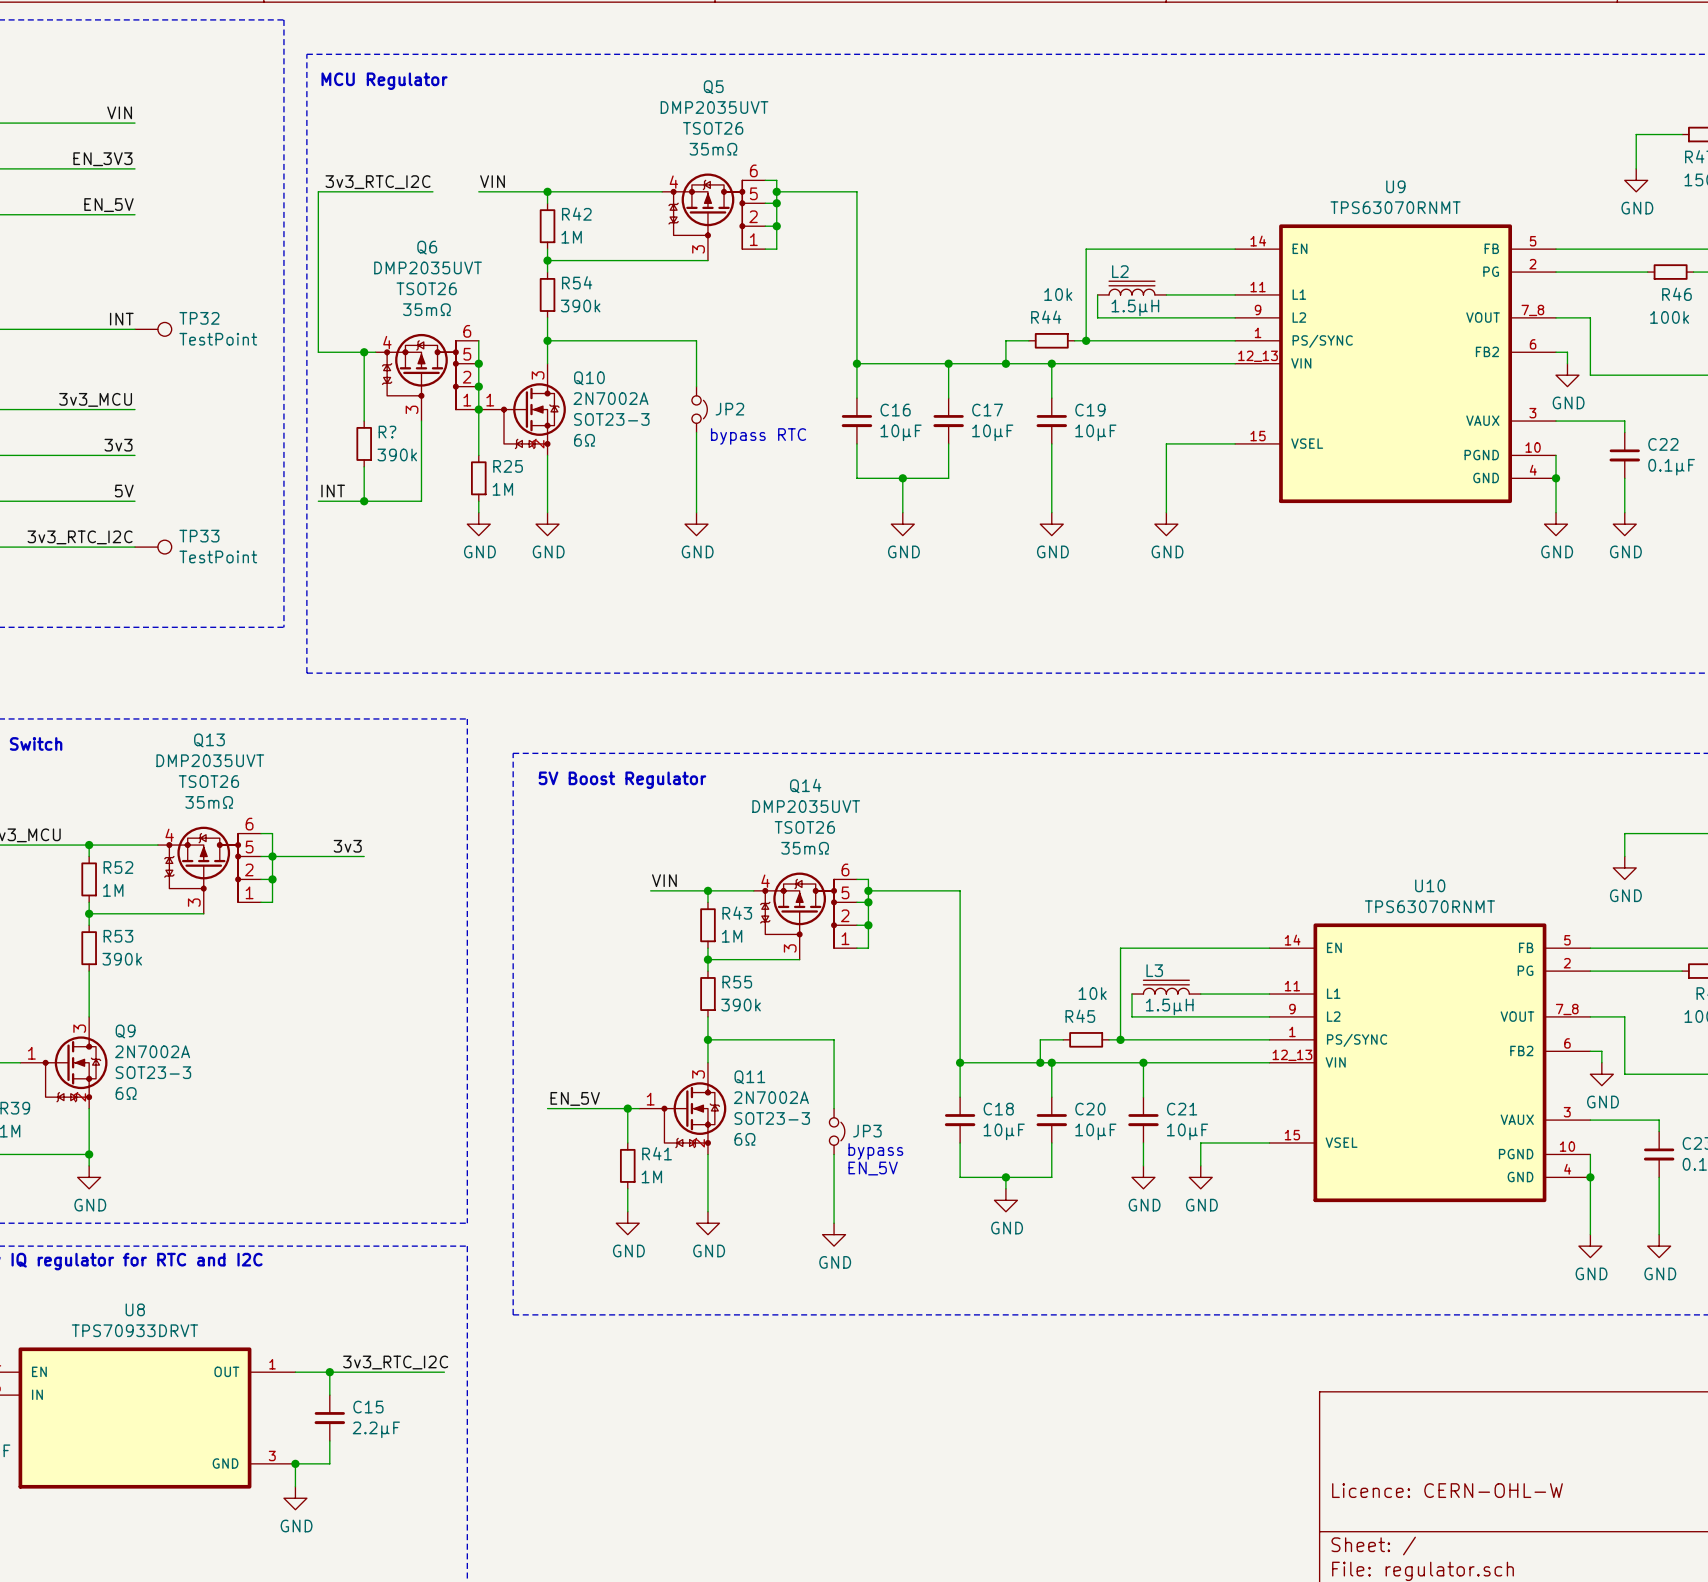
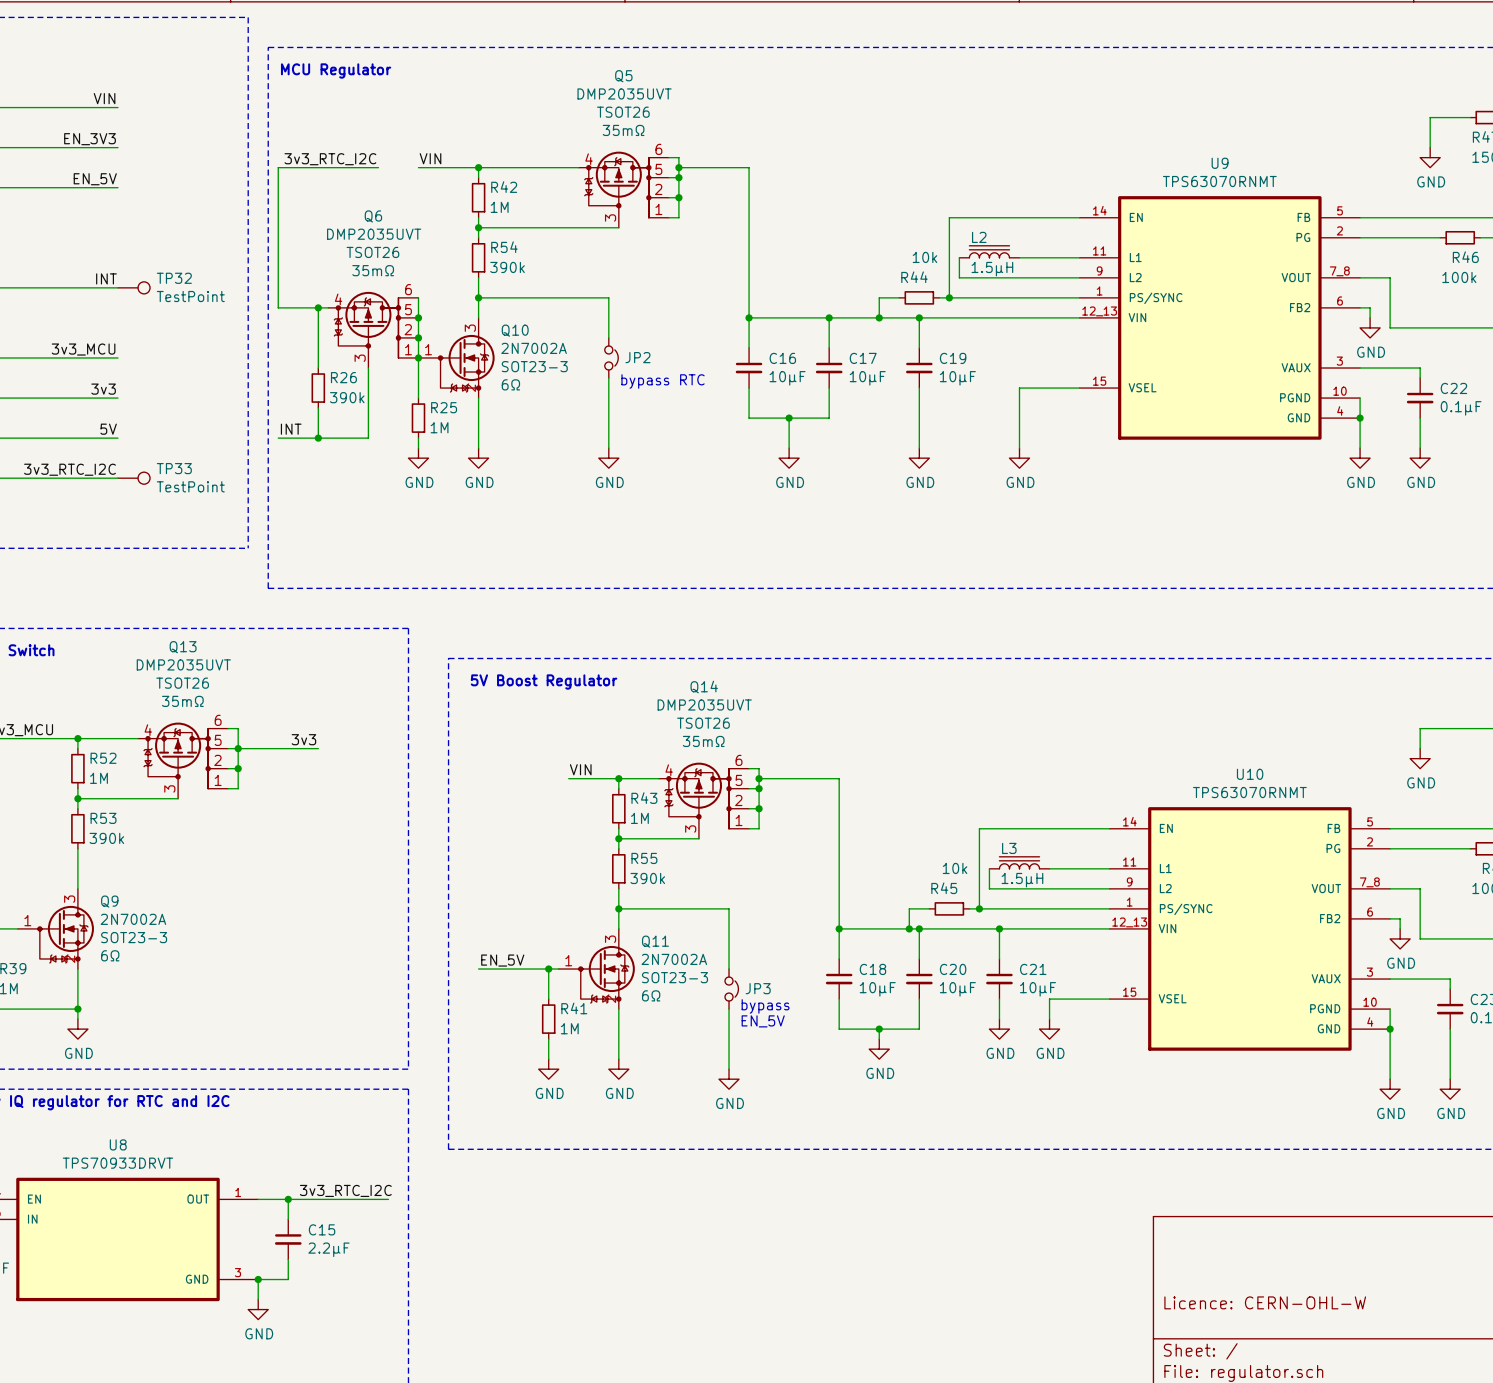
R? name: R? (387, 432) -> R26 (343, 377)

